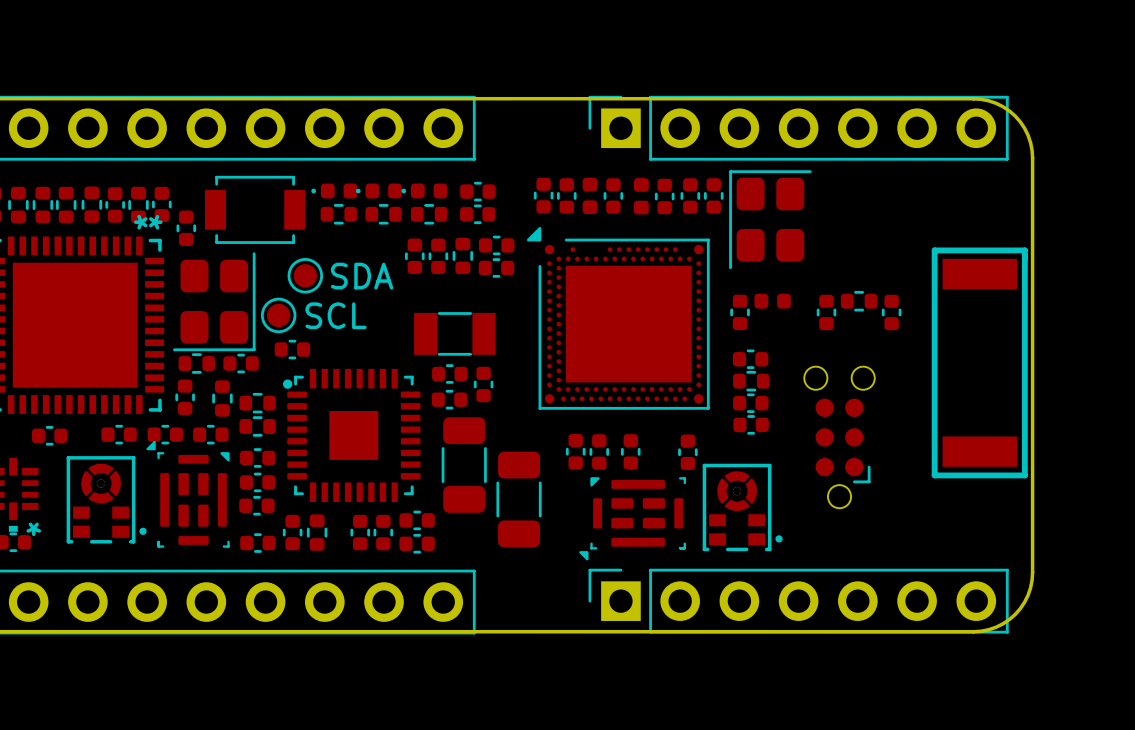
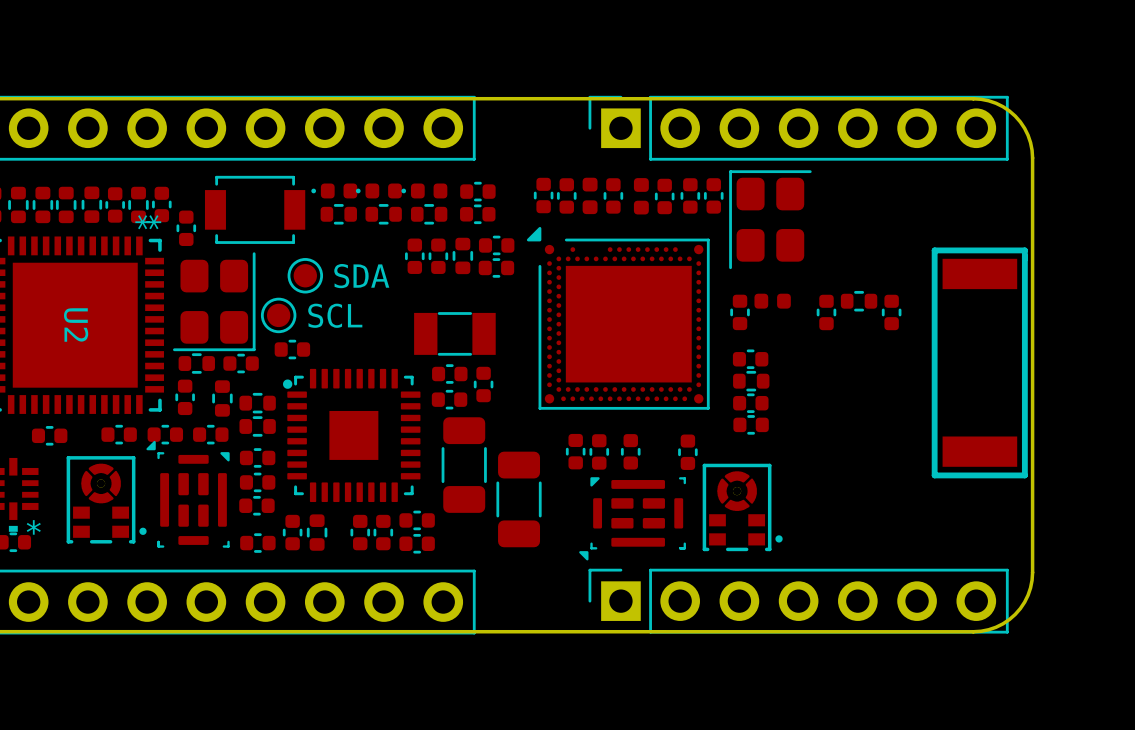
U2 name: none -> U2 (76, 325)
part: (839, 437) -> none

